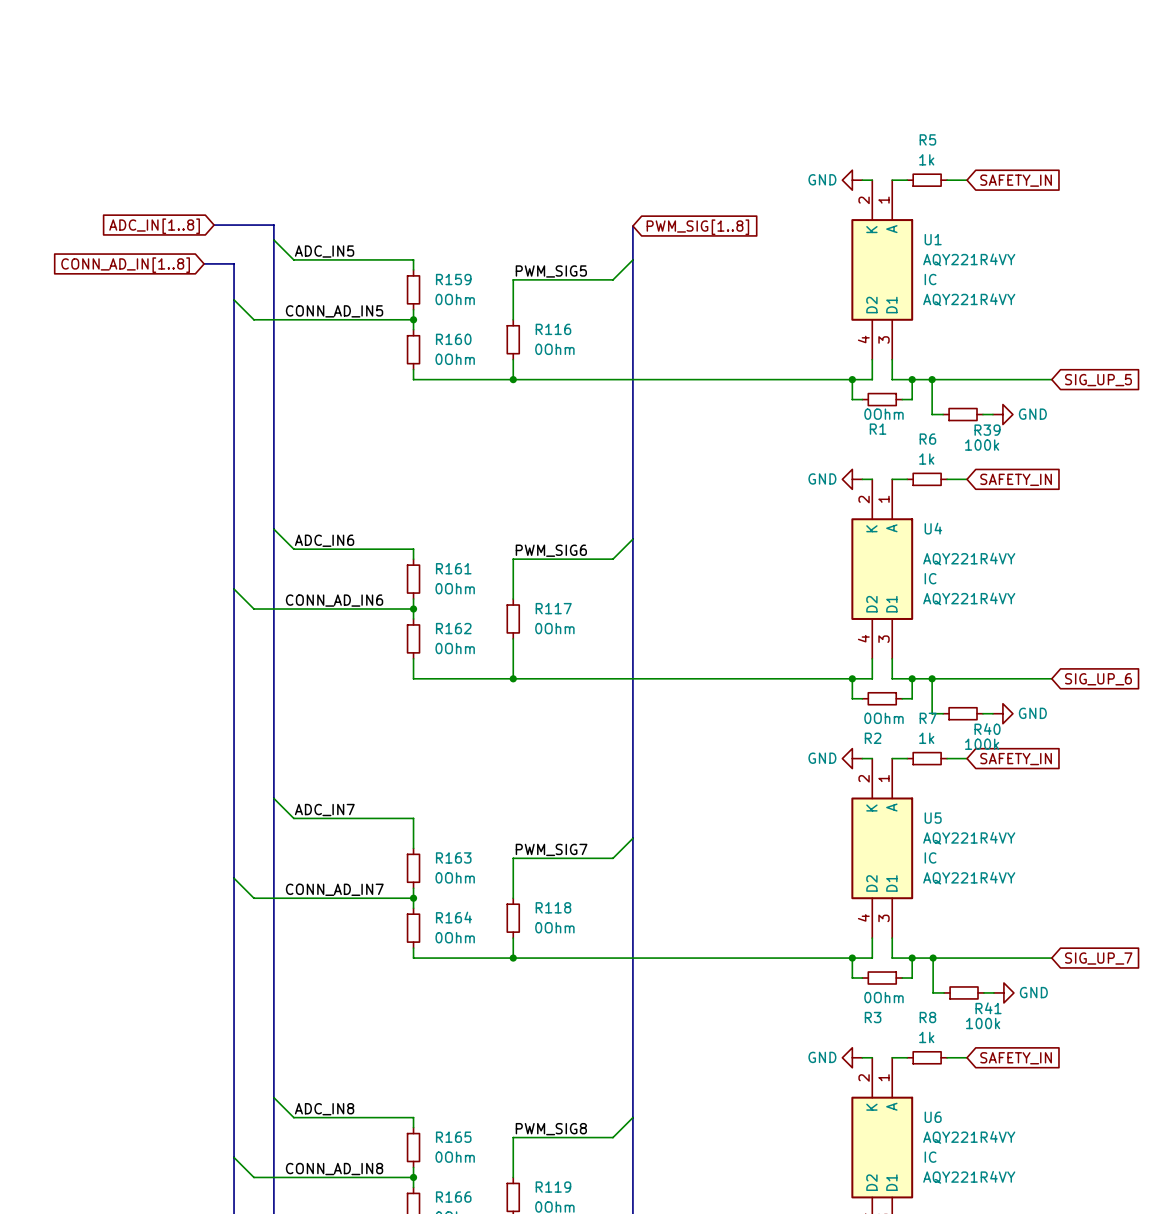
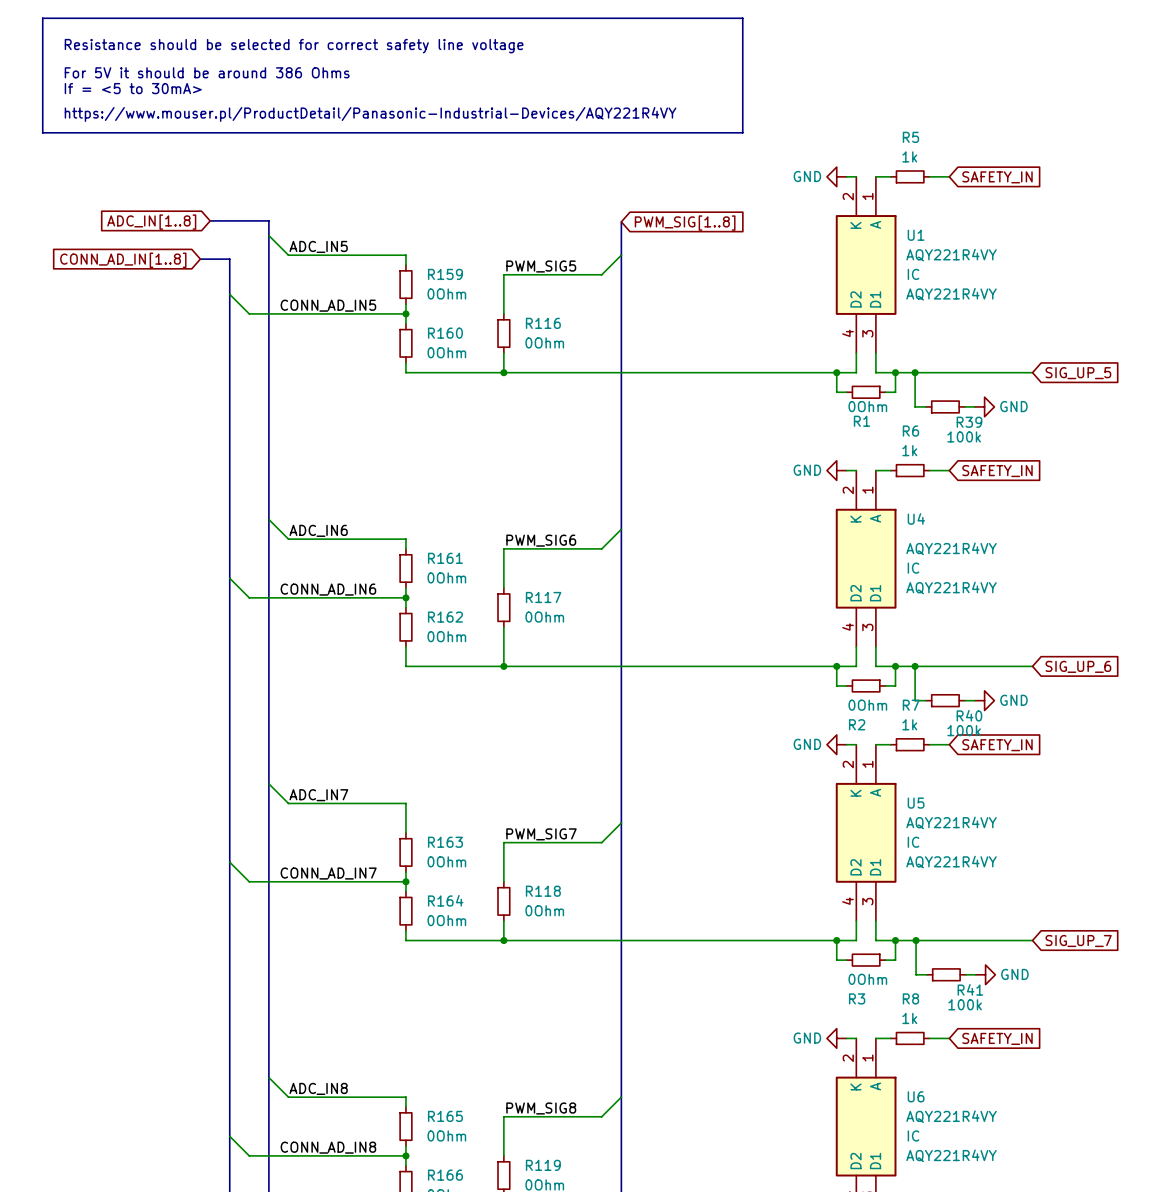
line: none -> (42, 18) (42, 132) (742, 132) (742, 18) (42, 18)
text: none -> Resistance should be selected for correct safety line voltage (294, 46)
text: none -> For 5V it should be around 386 Ohms (207, 72)
text: none -> If = <5 to 30mA> (133, 88)
text: none -> https://www.mouser.pl/ProductDetail/Panasonic-Industrial-Devices/AQY221R4VY (370, 114)

